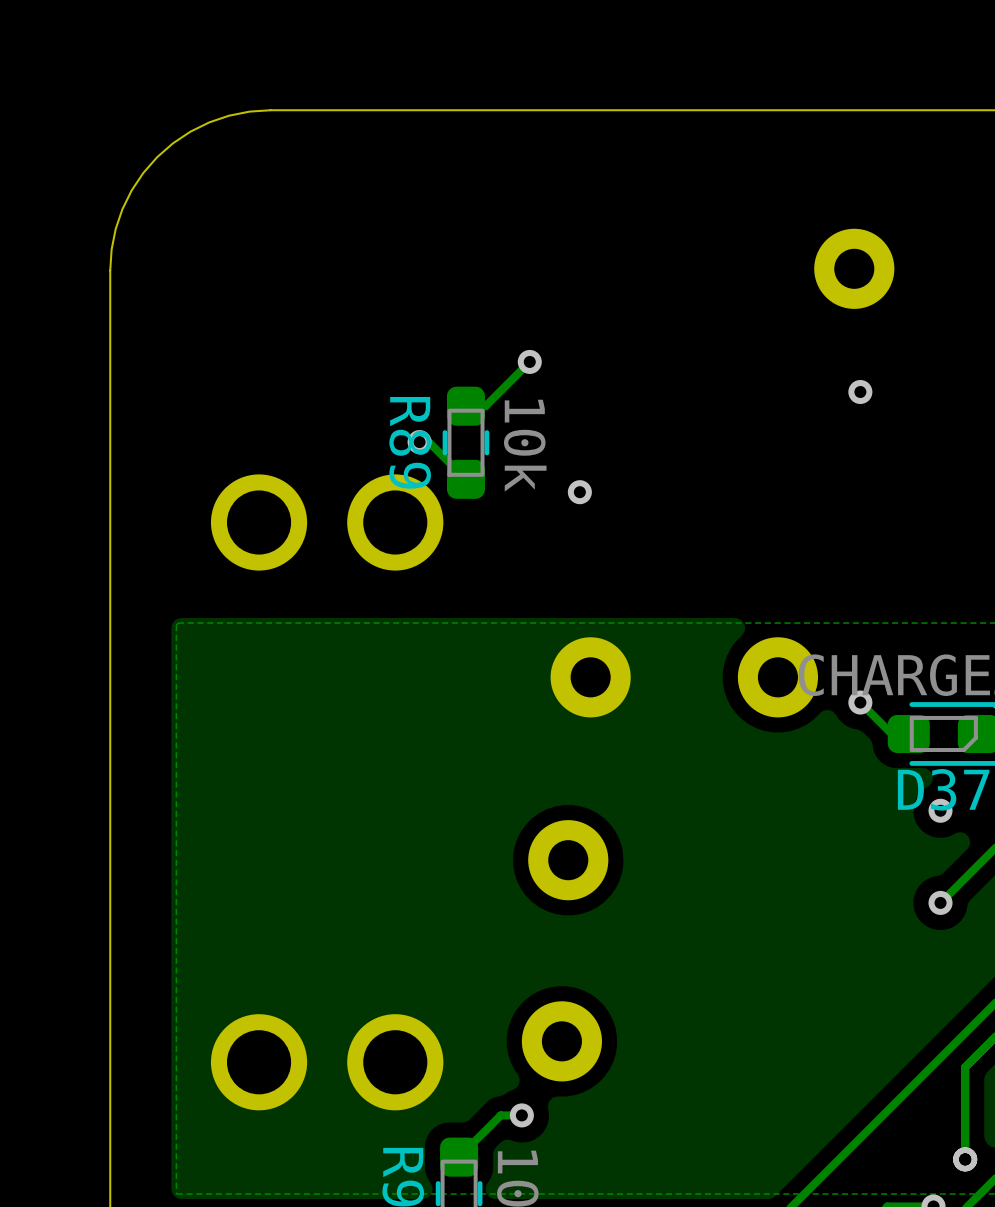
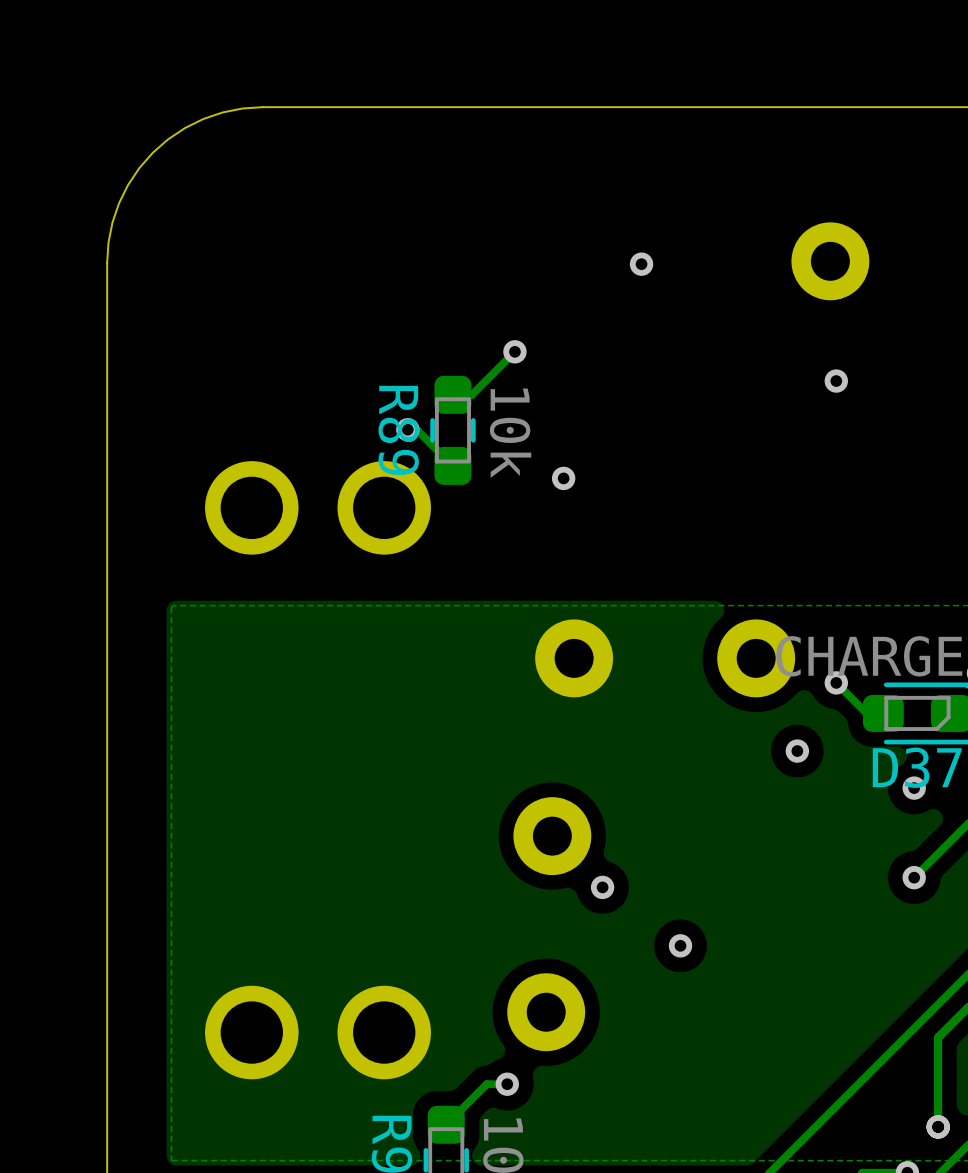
via: none -> (641, 264)
via: none -> (797, 751)
via: none -> (602, 887)
via: none -> (680, 945)

